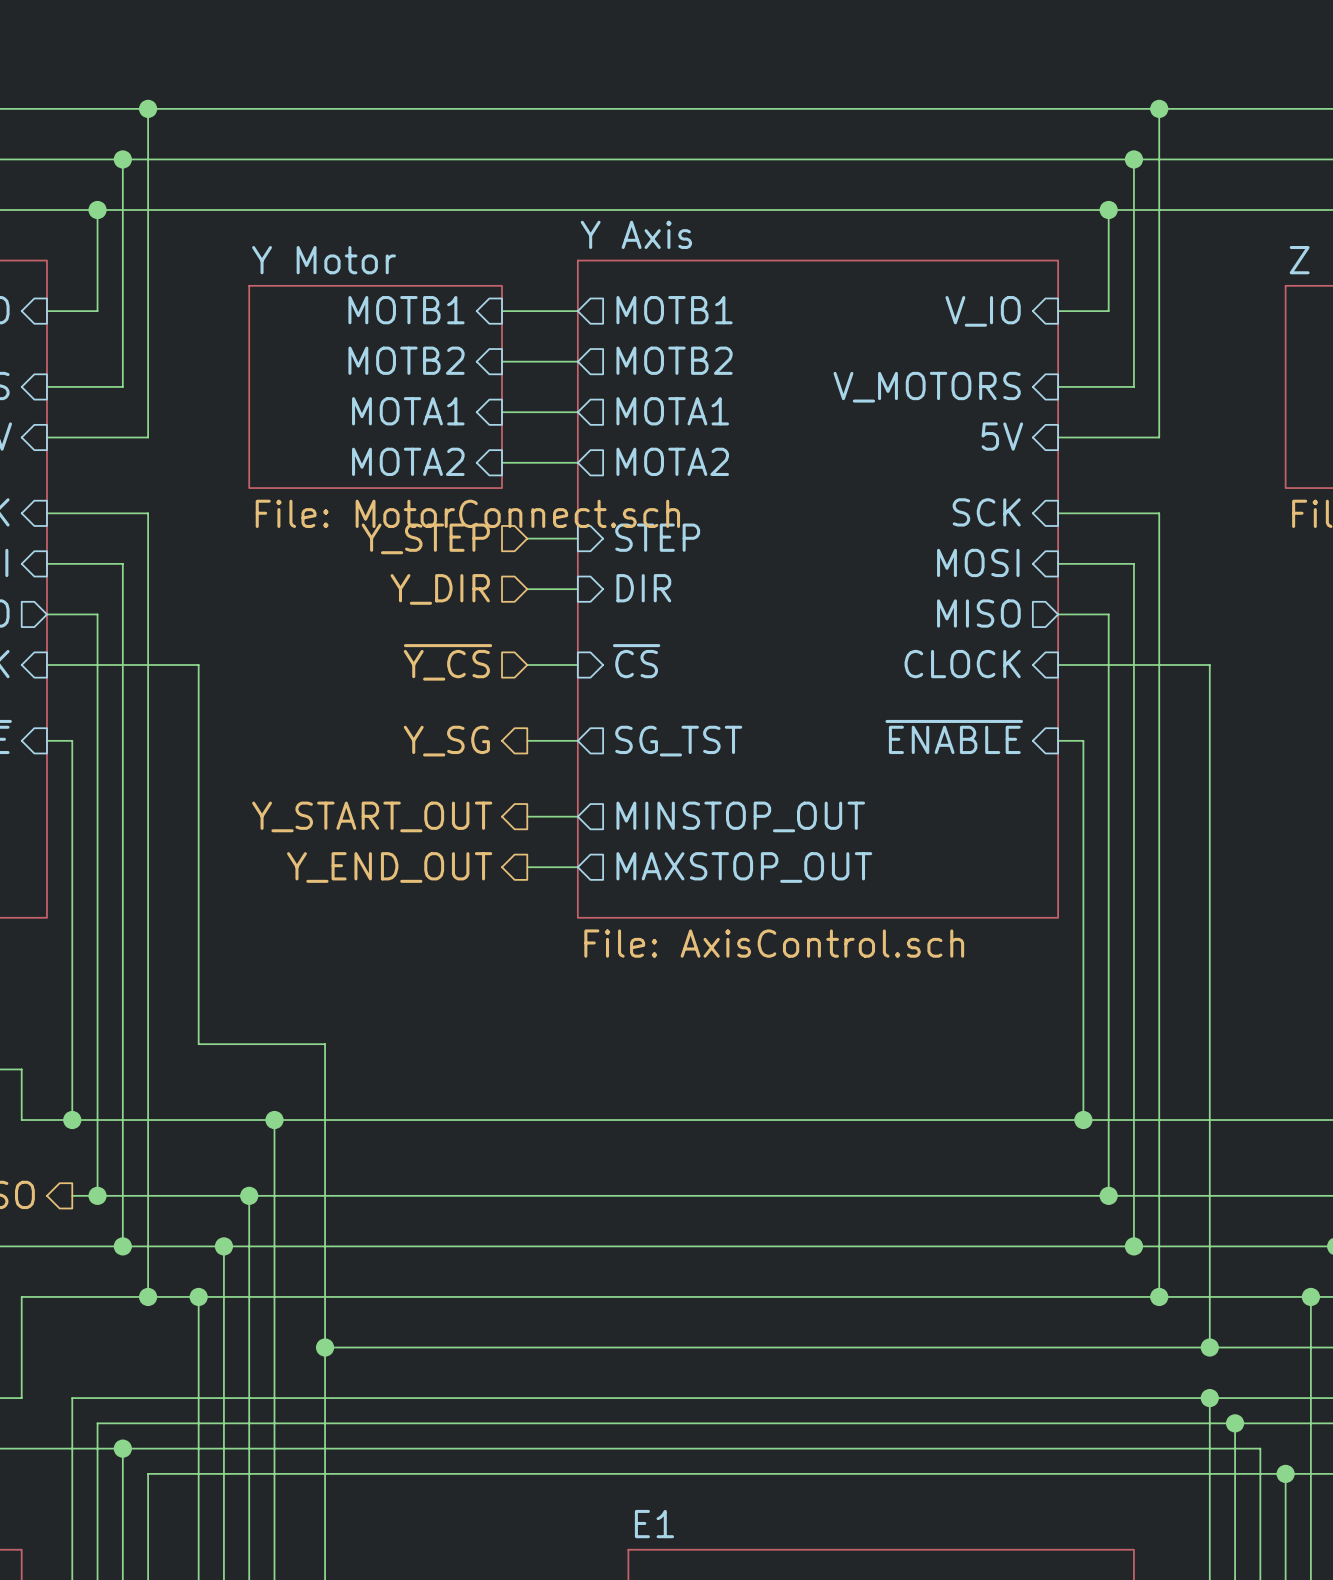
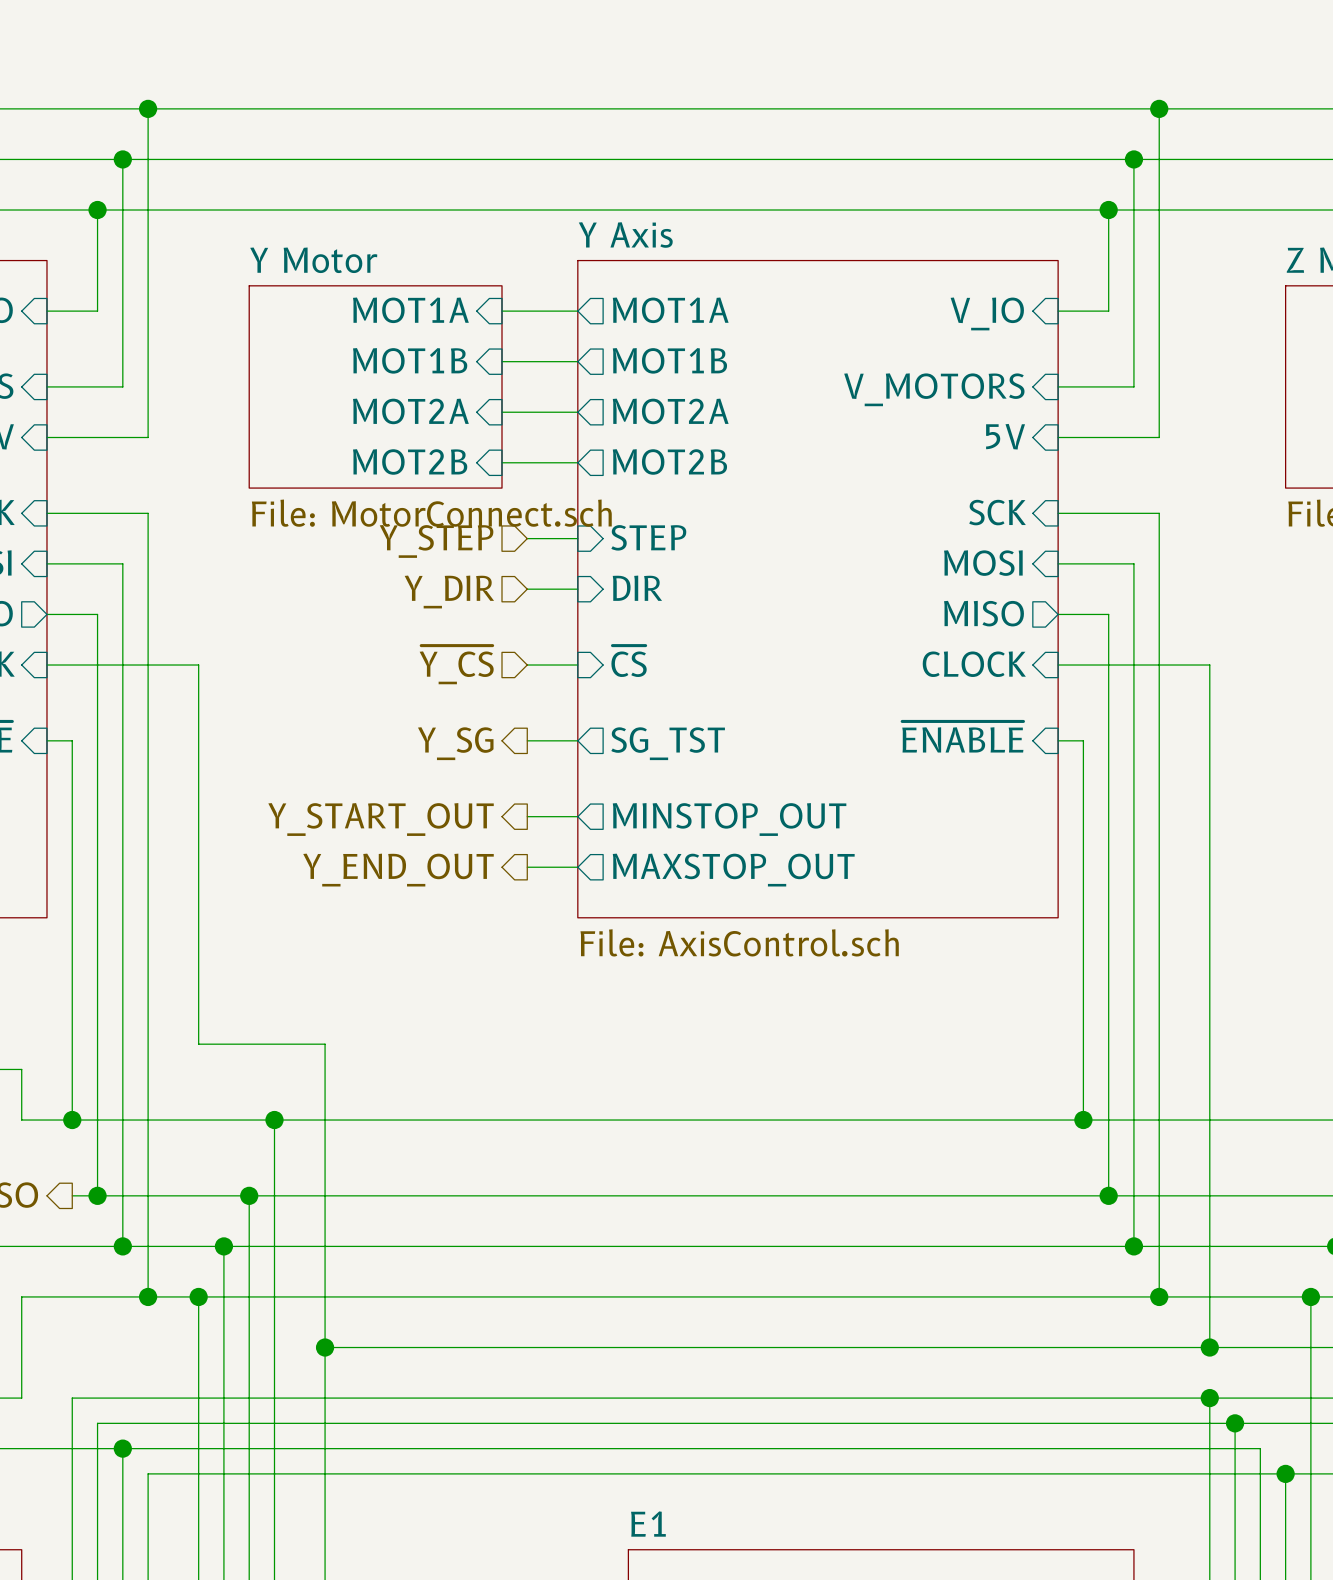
sheet pin: MOTB1 (406, 310) -> MOT1A (410, 310)
sheet pin: MOTB1 (674, 310) -> MOT1A (670, 310)
sheet pin: MOTB2 (406, 360) -> MOT1B (410, 360)
sheet pin: MOTB2 (674, 360) -> MOT1B (669, 360)
sheet pin: MOTA1 (408, 411) -> MOT2A (410, 411)
sheet pin: MOTA1 (672, 411) -> MOT2A (670, 411)
sheet pin: MOTA2 (408, 461) -> MOT2B (410, 461)
sheet pin: MOTA2 (672, 461) -> MOT2B (669, 461)

